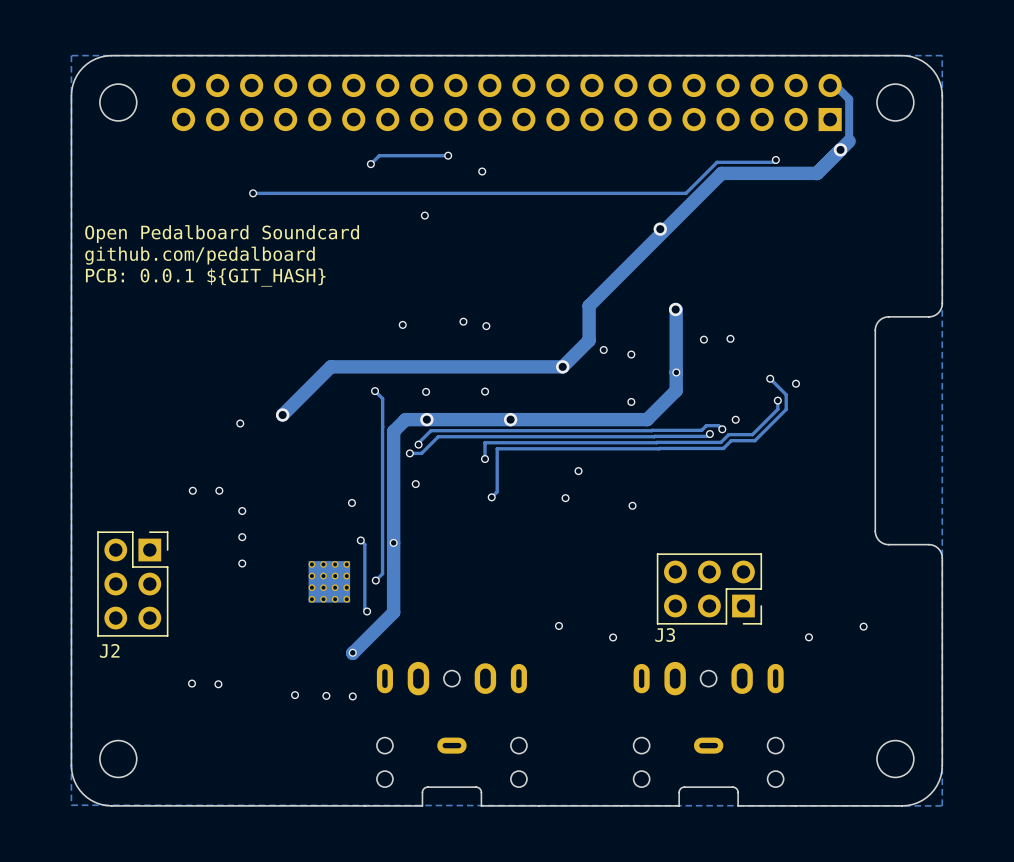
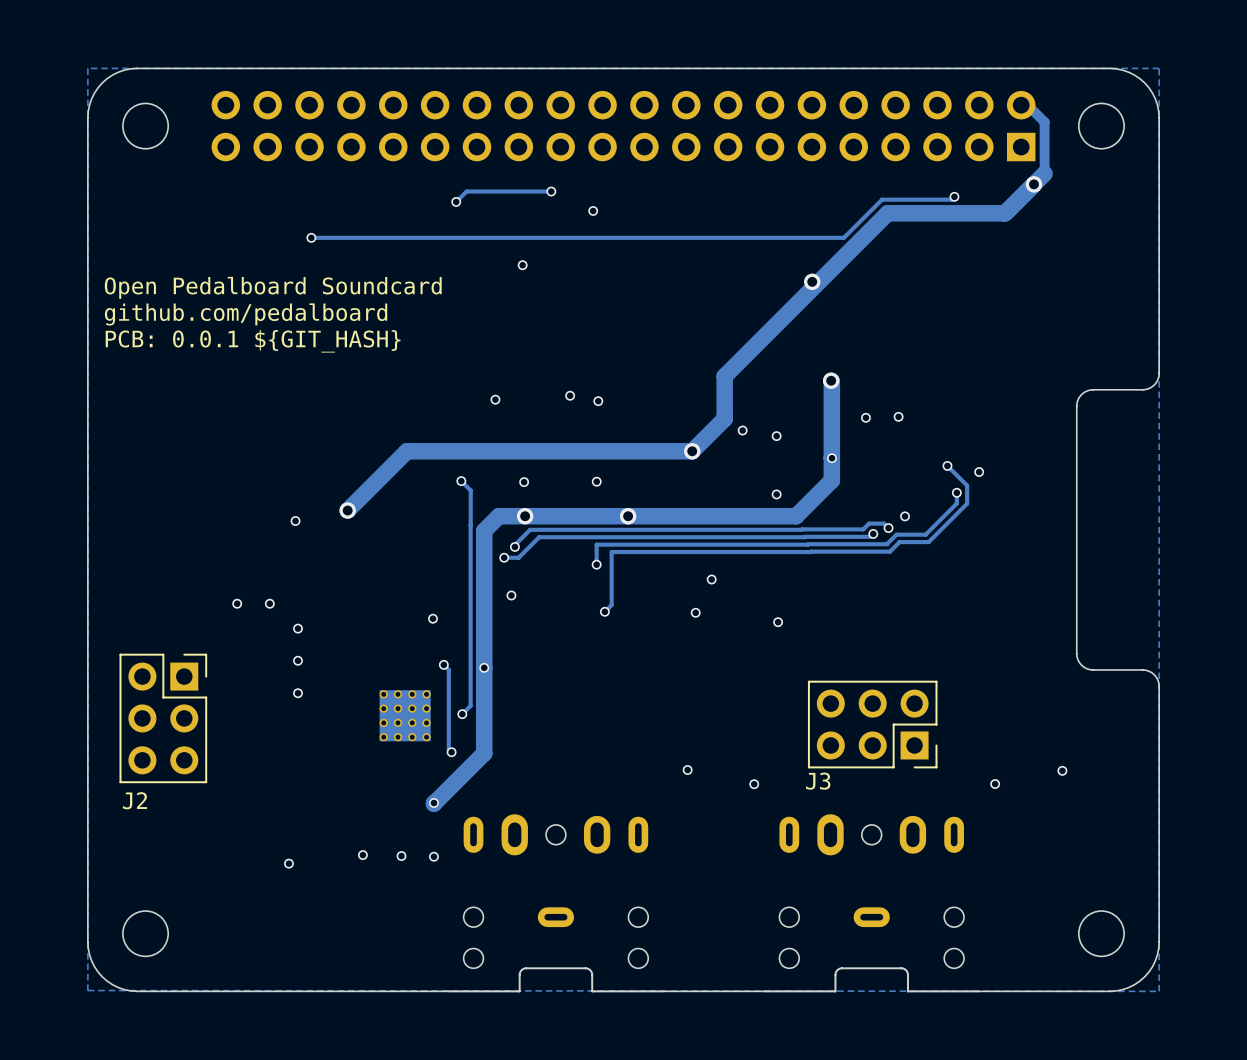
via: (192, 683) -> none
via: (218, 684) -> none
via: none -> (288, 863)

